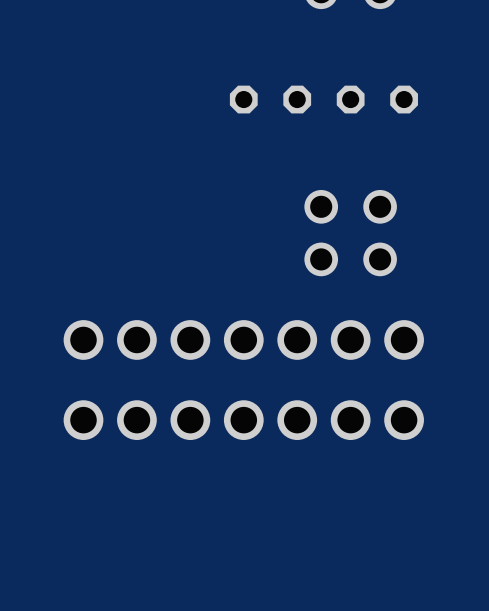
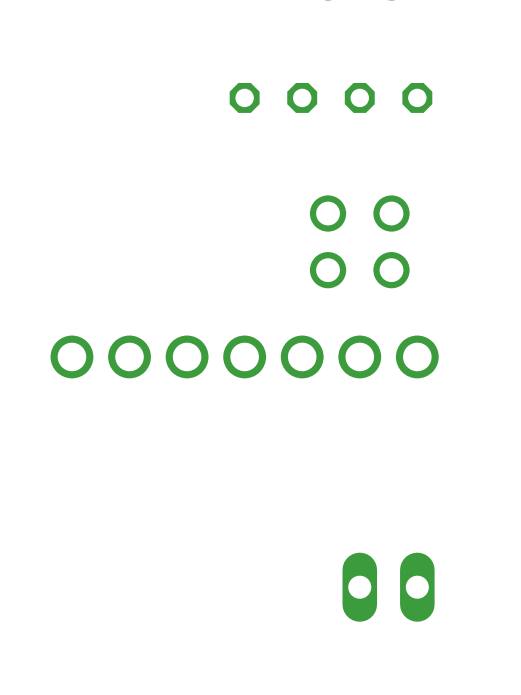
part: (243, 420) -> none
part: none -> (388, 587)

